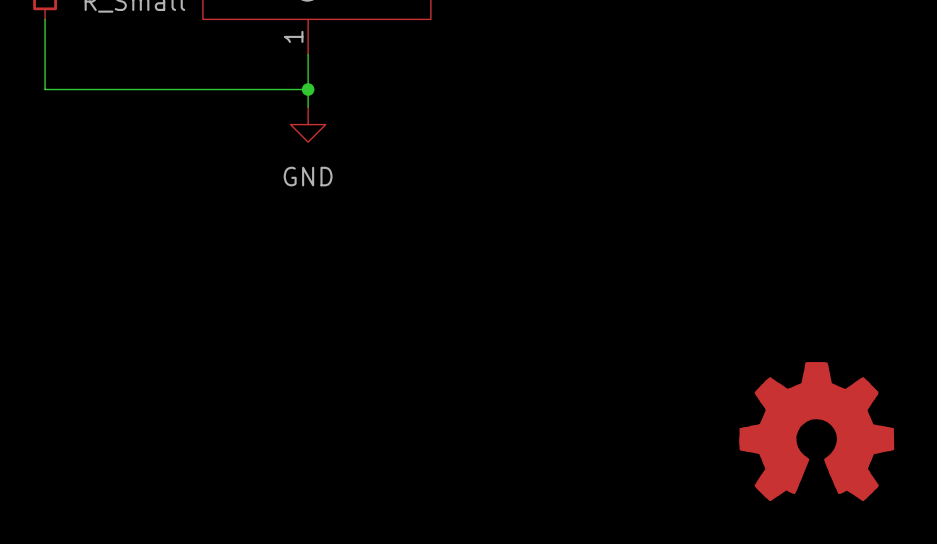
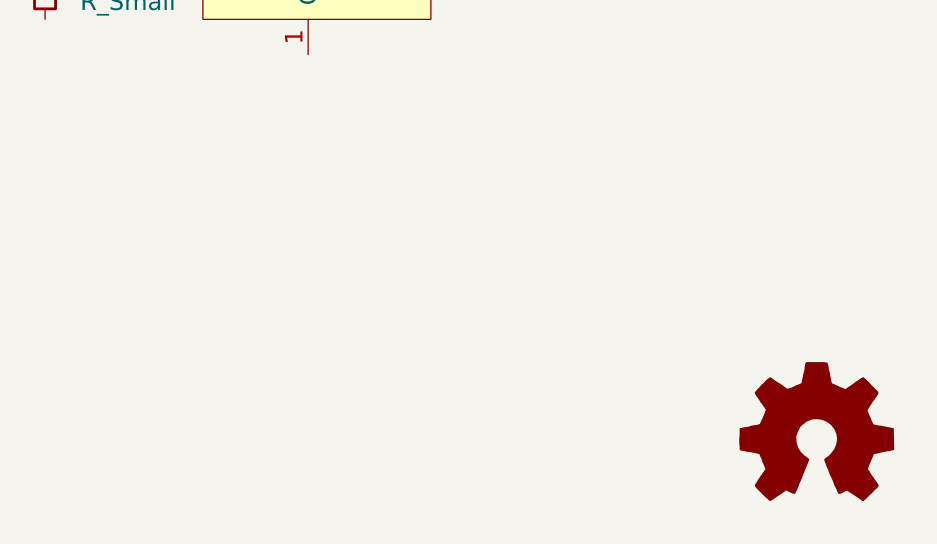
wire: (45, 19) (45, 89) (308, 89) -> none
wire: (308, 54) (308, 107) -> none
junction: (308, 89) -> none
power symbol: GND (308, 124) -> none

